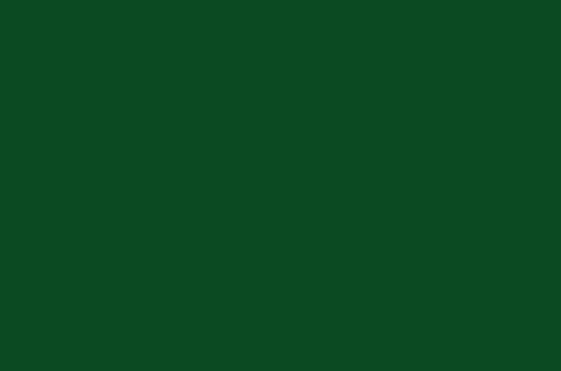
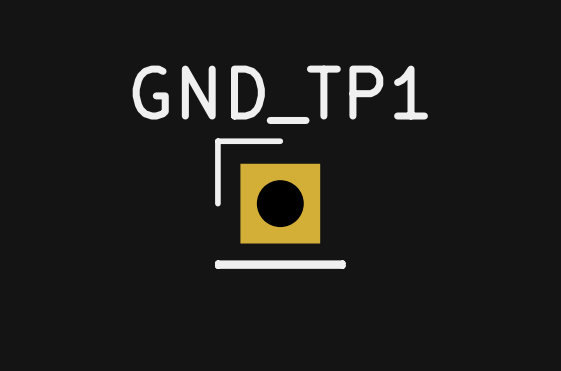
GND_TP1: none -> (280, 203)

